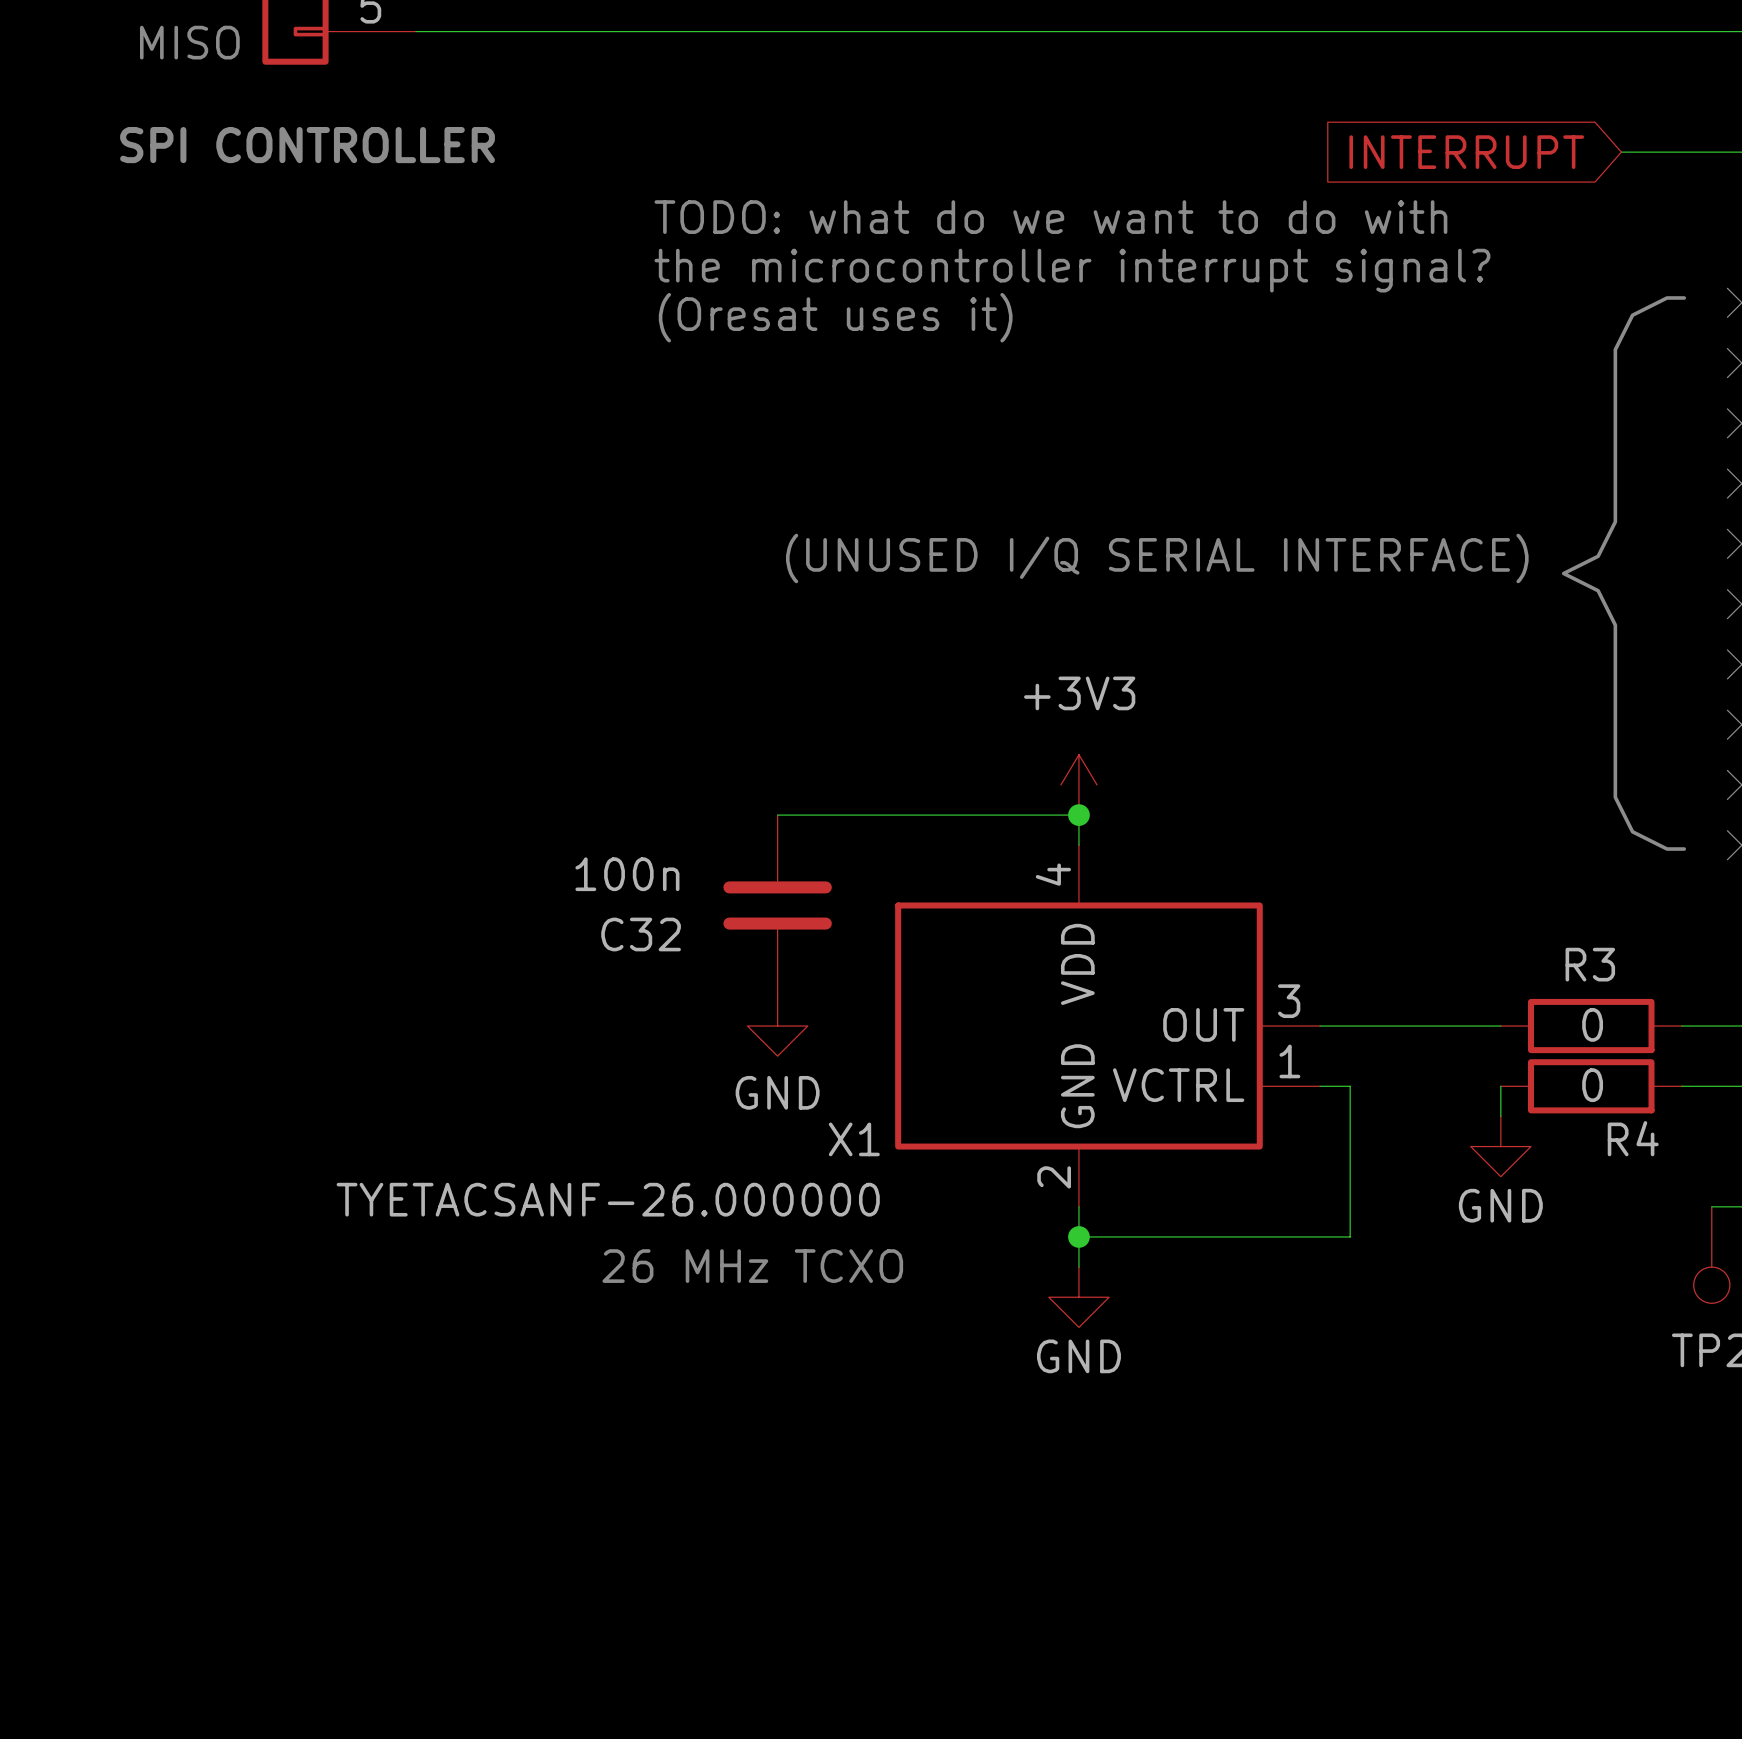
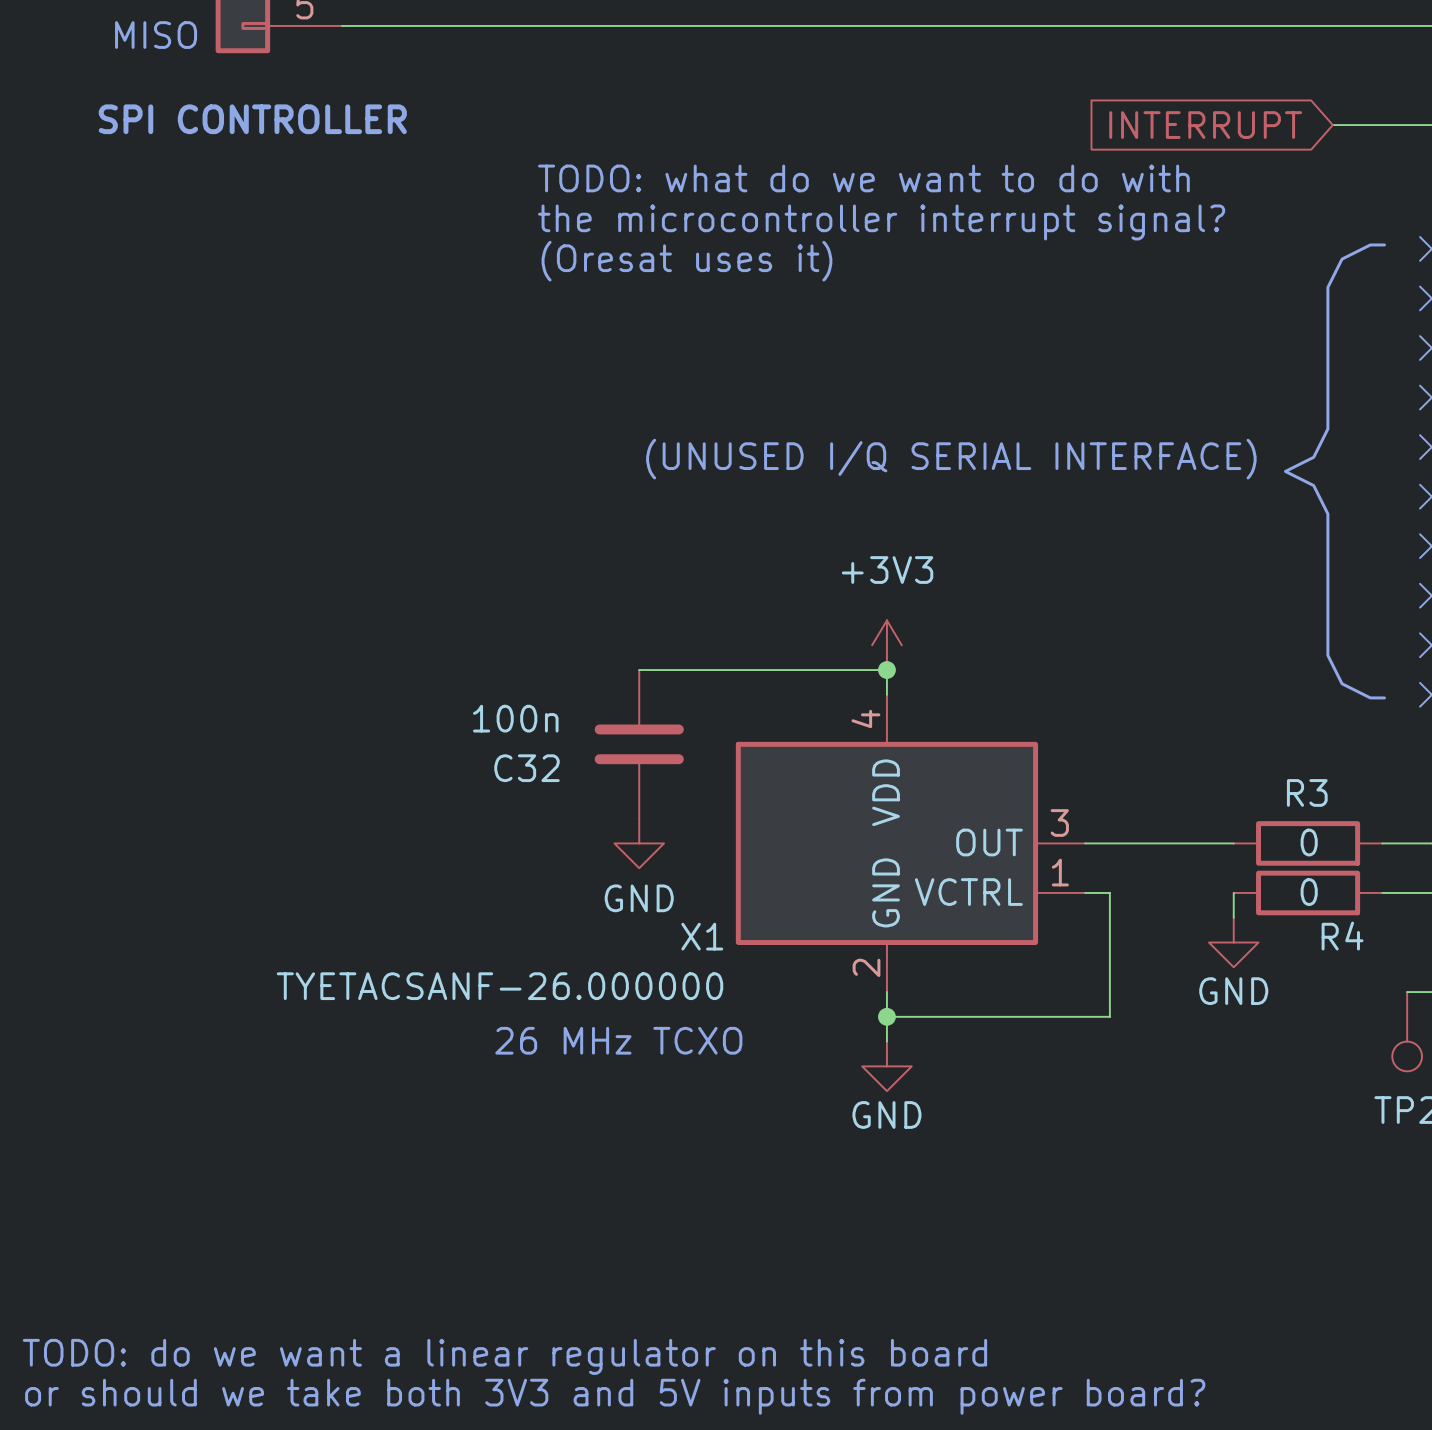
text: none -> TODO: do we want a linear regulator on this board (504, 1356)
text: none -> or should we take both 3V3 and 5V inputs from power board? (615, 1396)

